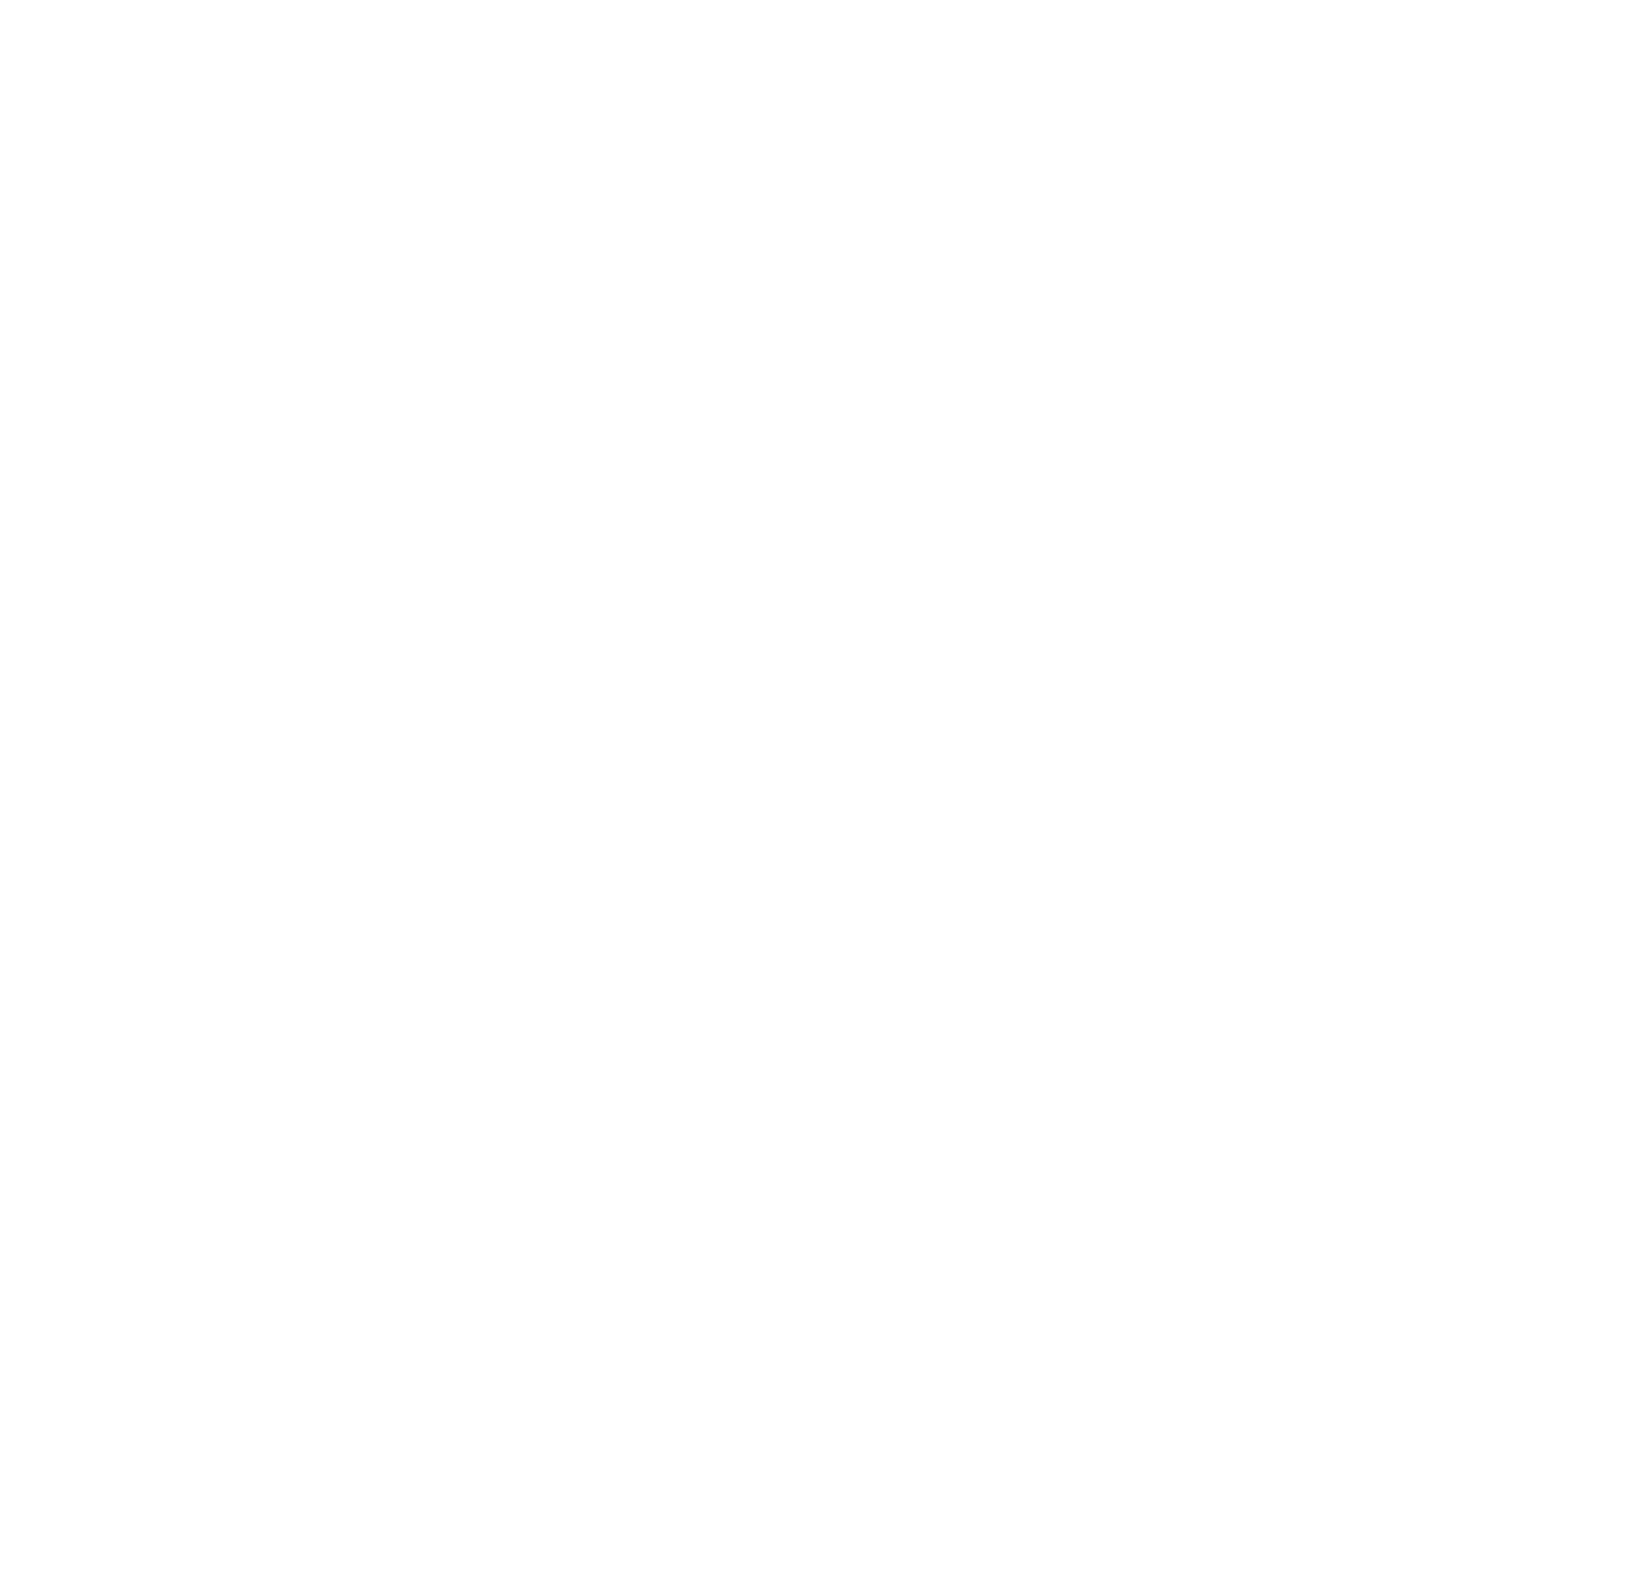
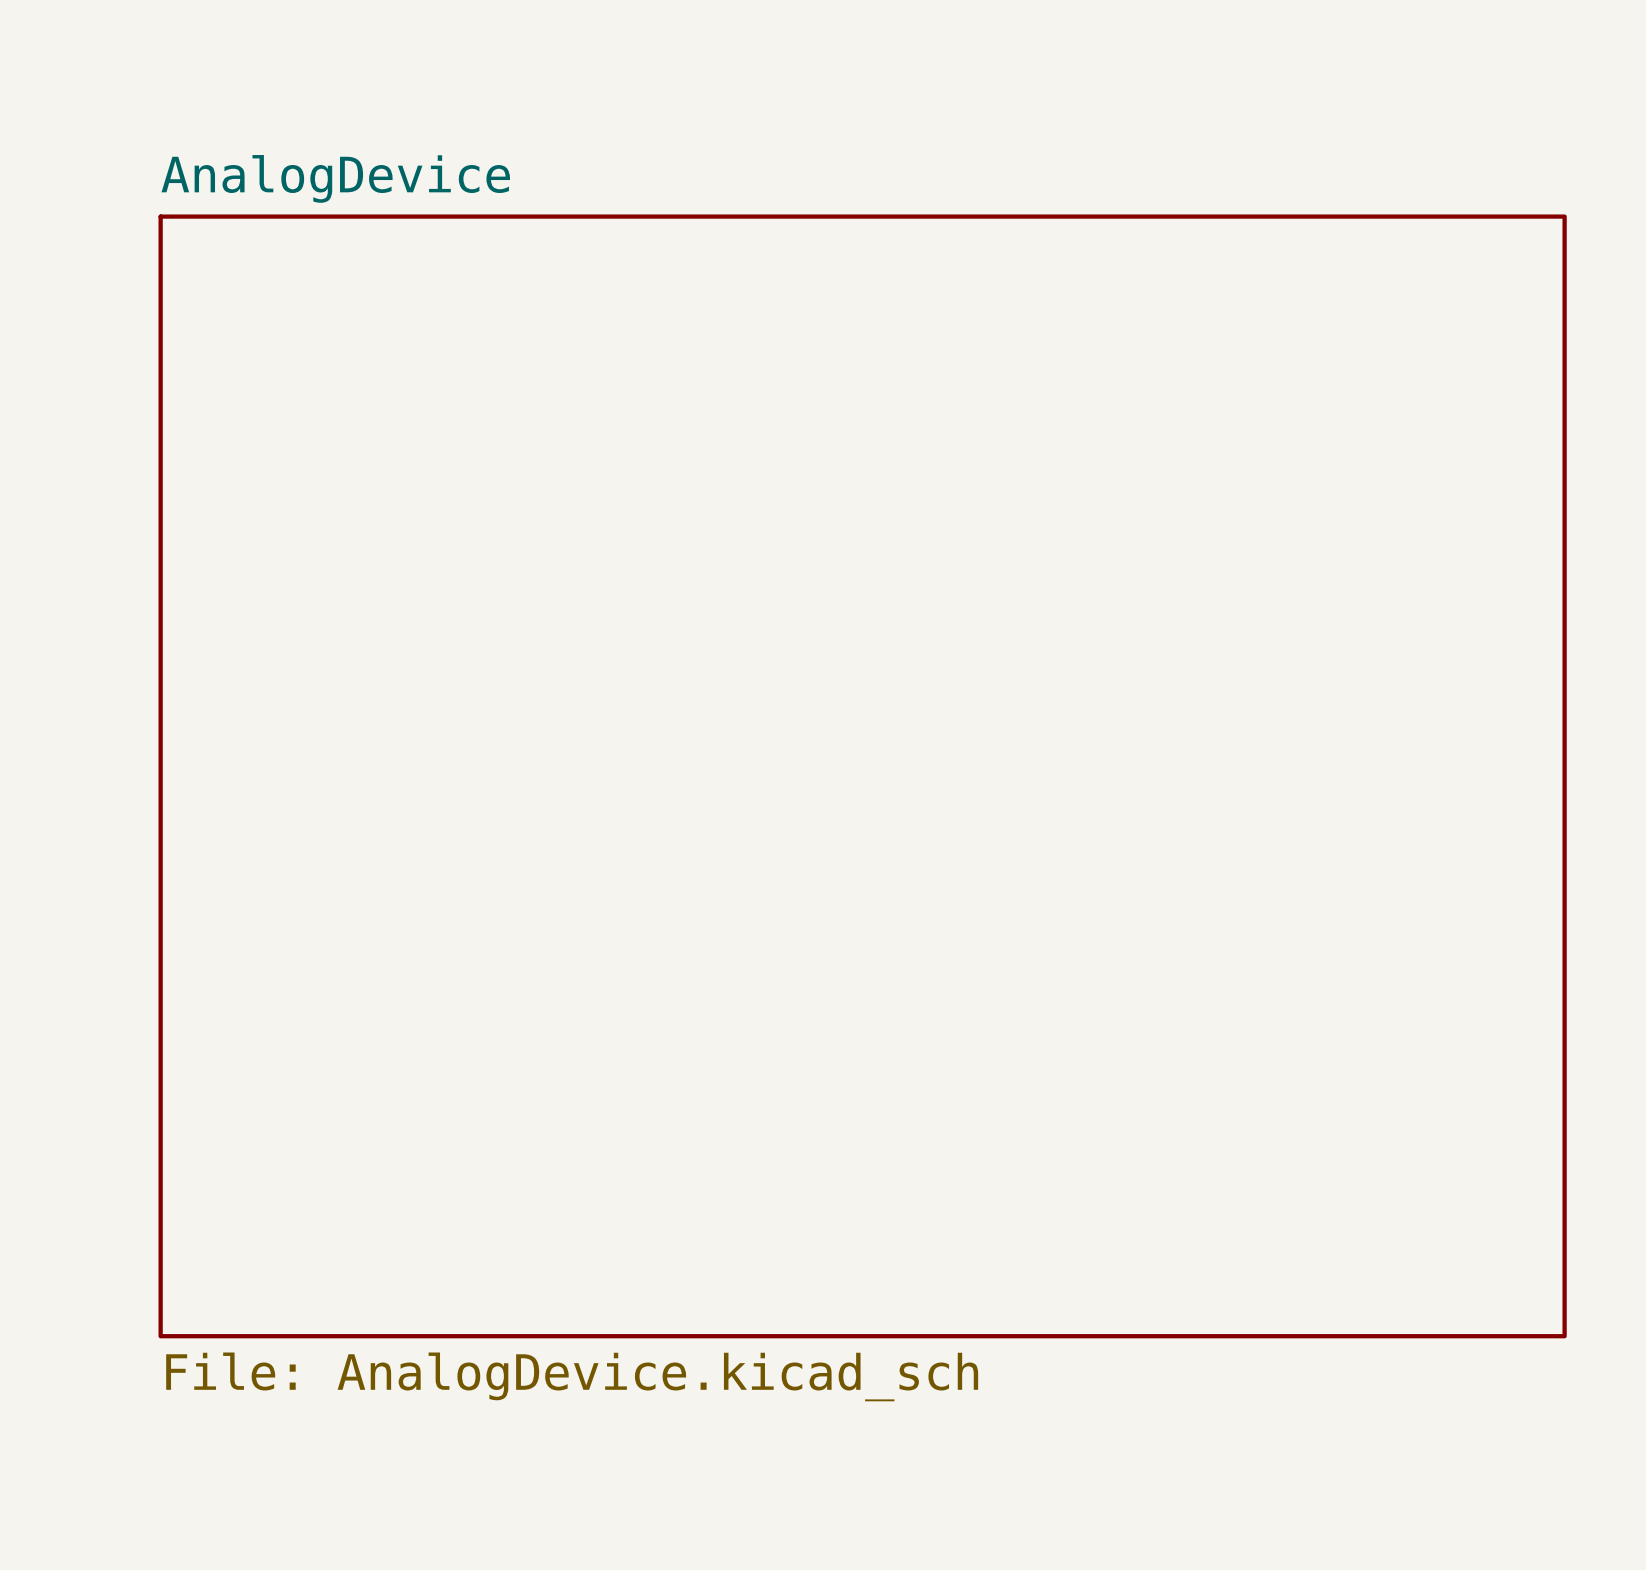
sheet AnalogDevice: none -> File: AnalogDevice.kicad_sch (862, 776)

